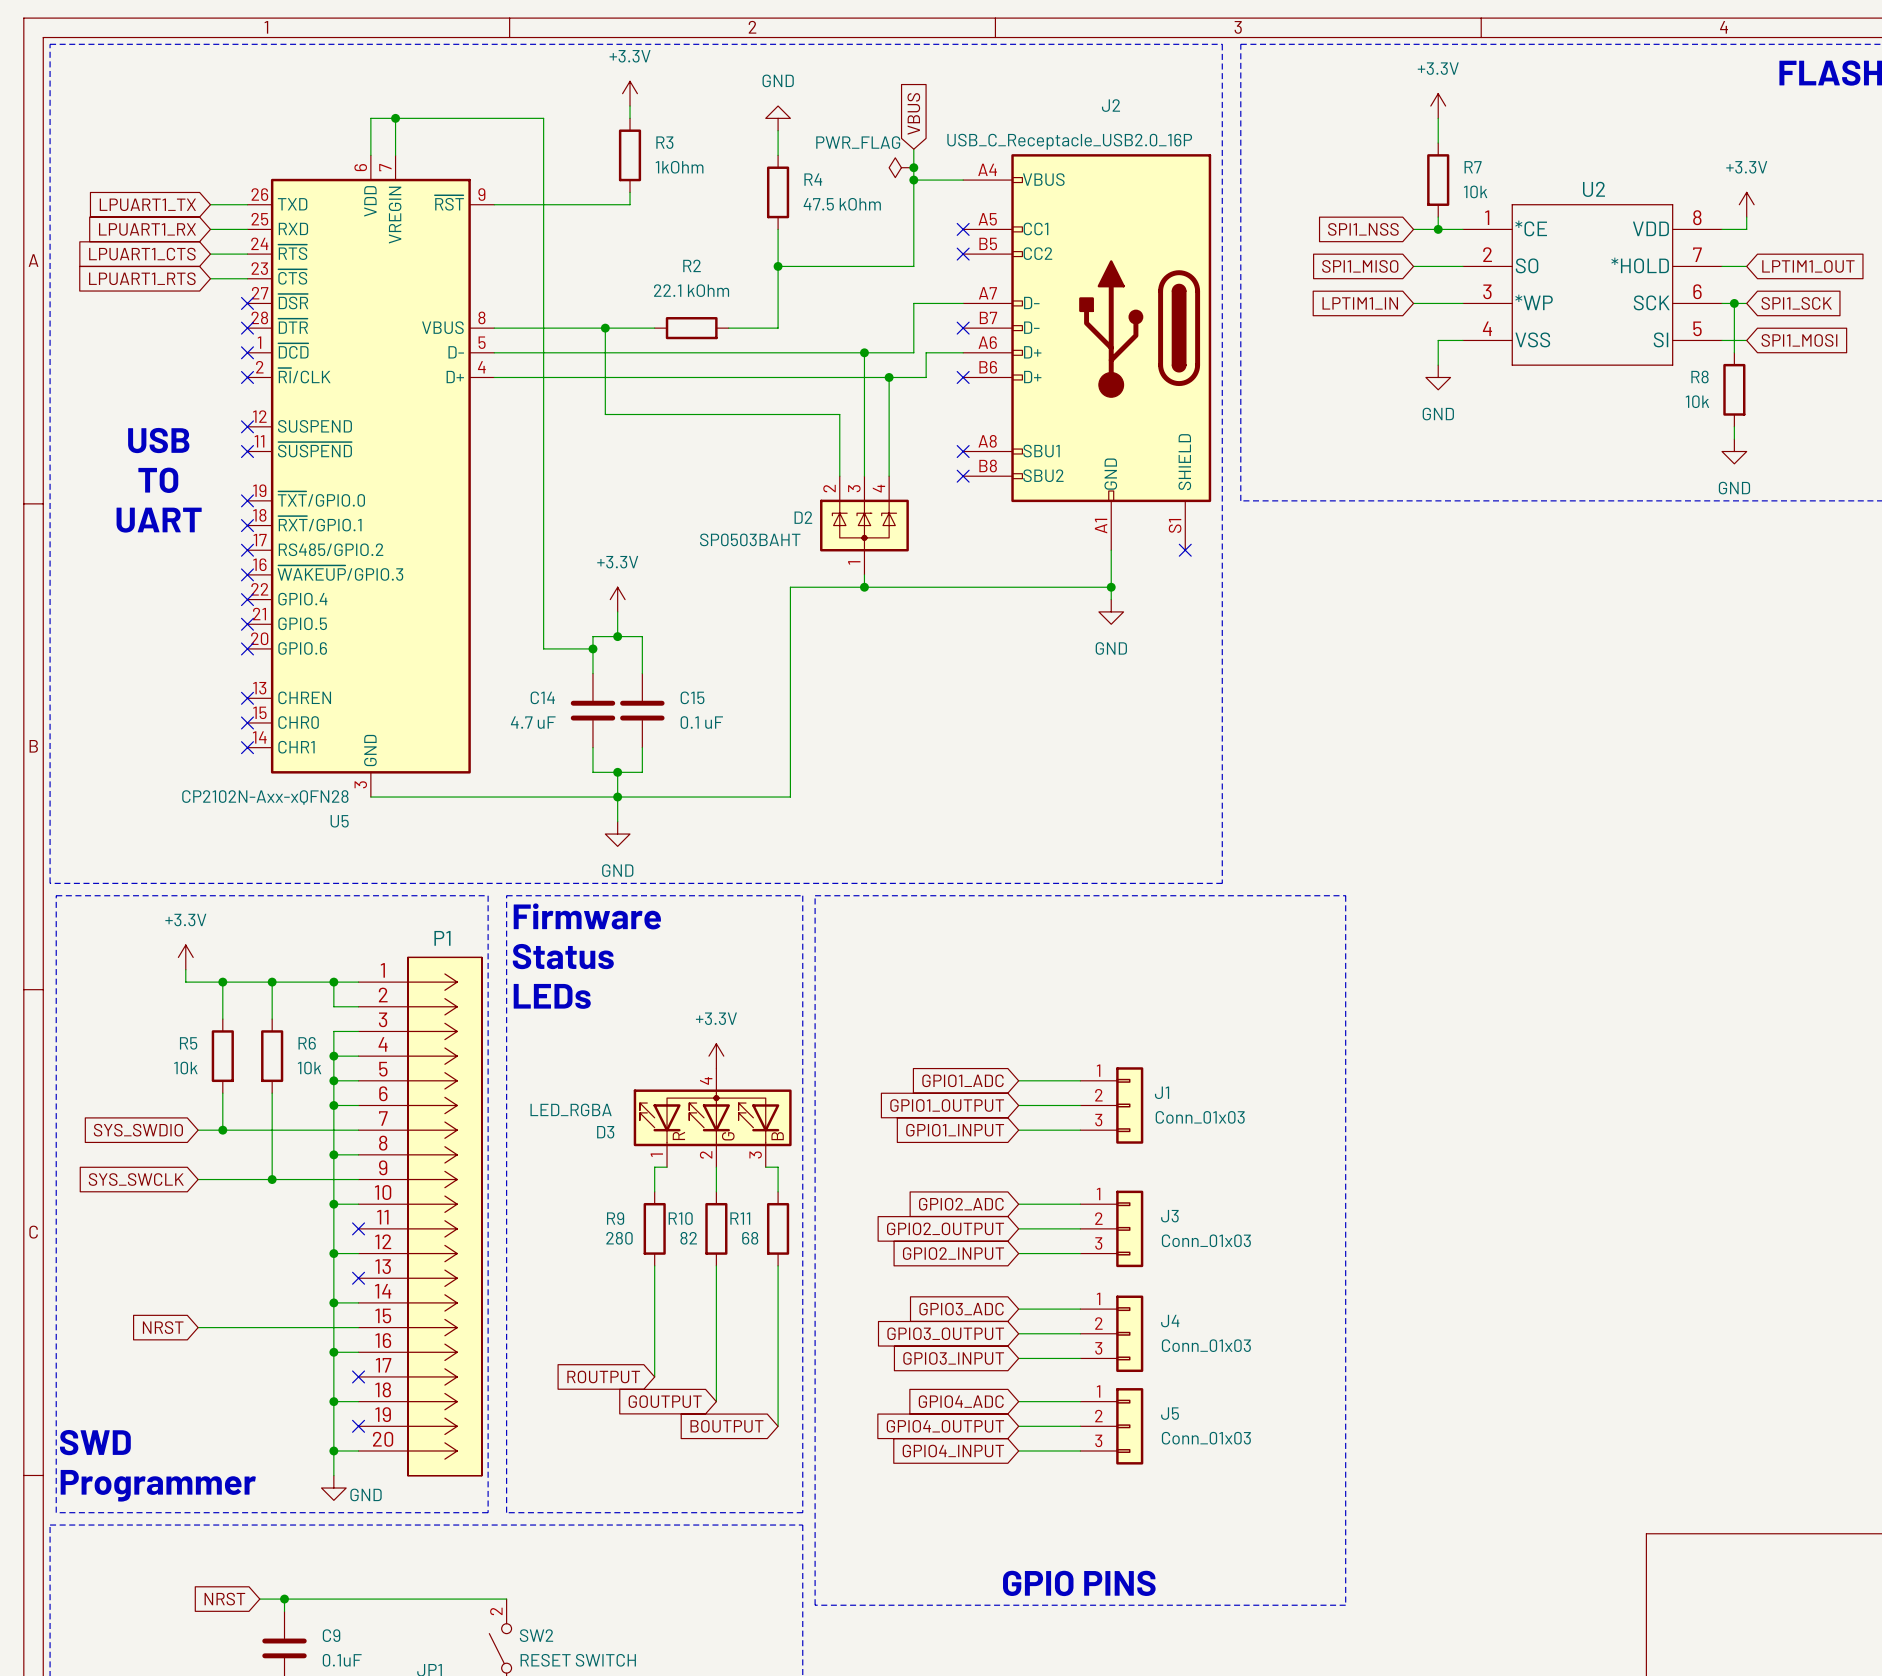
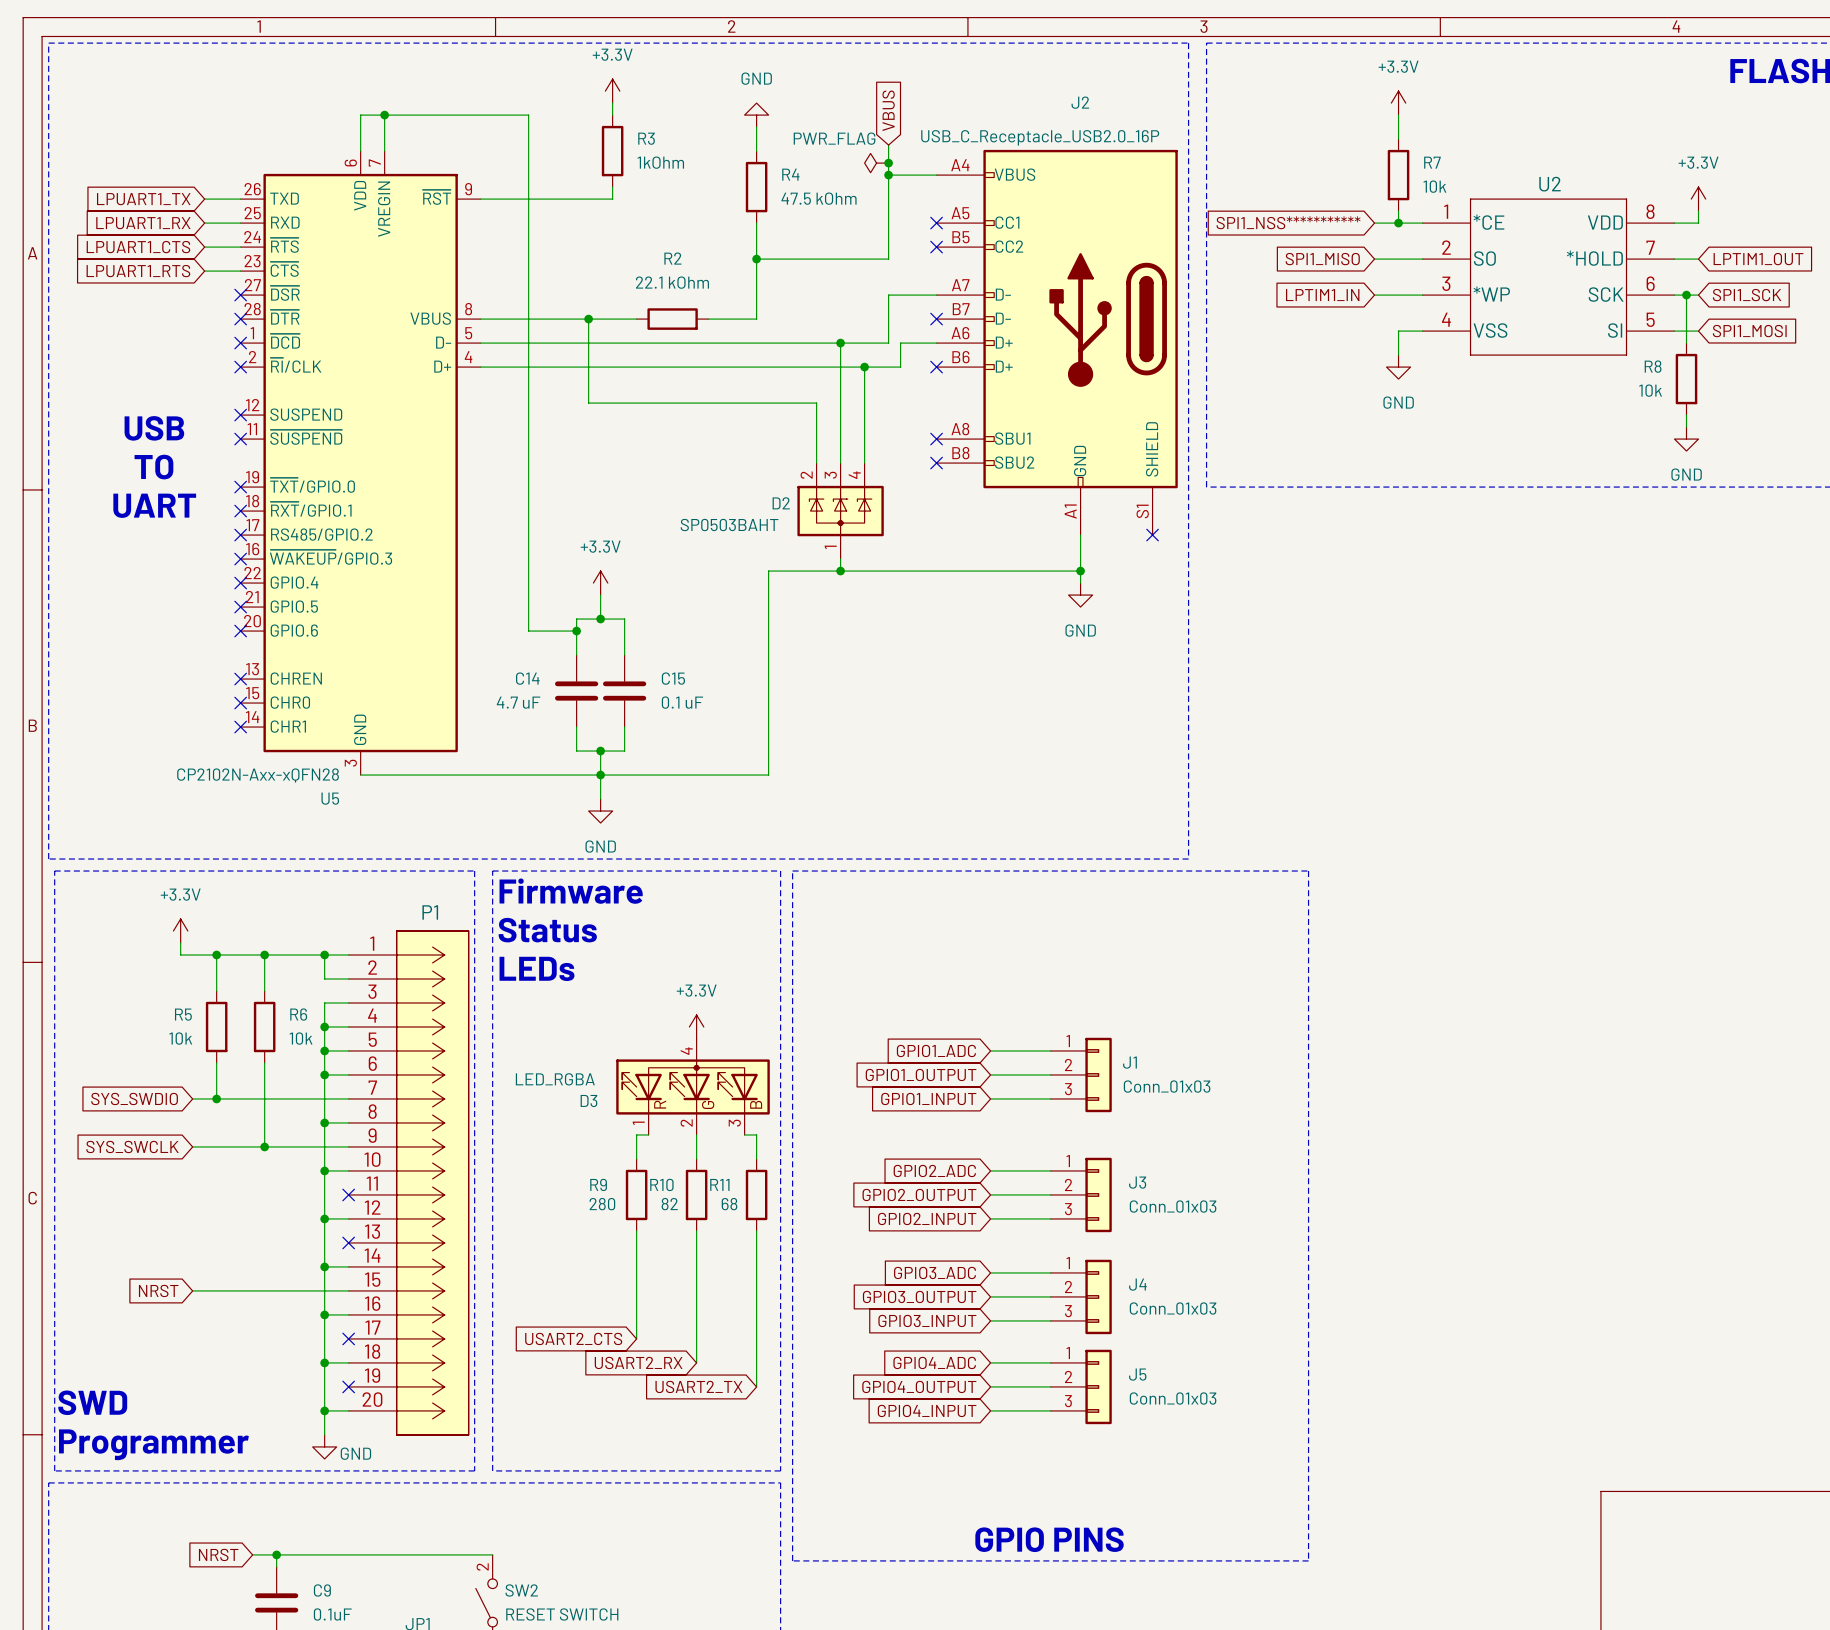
global label: SPI1_NSS (1363, 229) -> SPI1_NSS*********** (1288, 222)
global label: ROUTPUT (603, 1376) -> USART2_CTS (573, 1338)
global label: GOUTPUT (665, 1401) -> USART2_RX (638, 1362)
global label: BOUTPUT (726, 1426) -> USART2_TX (698, 1386)

